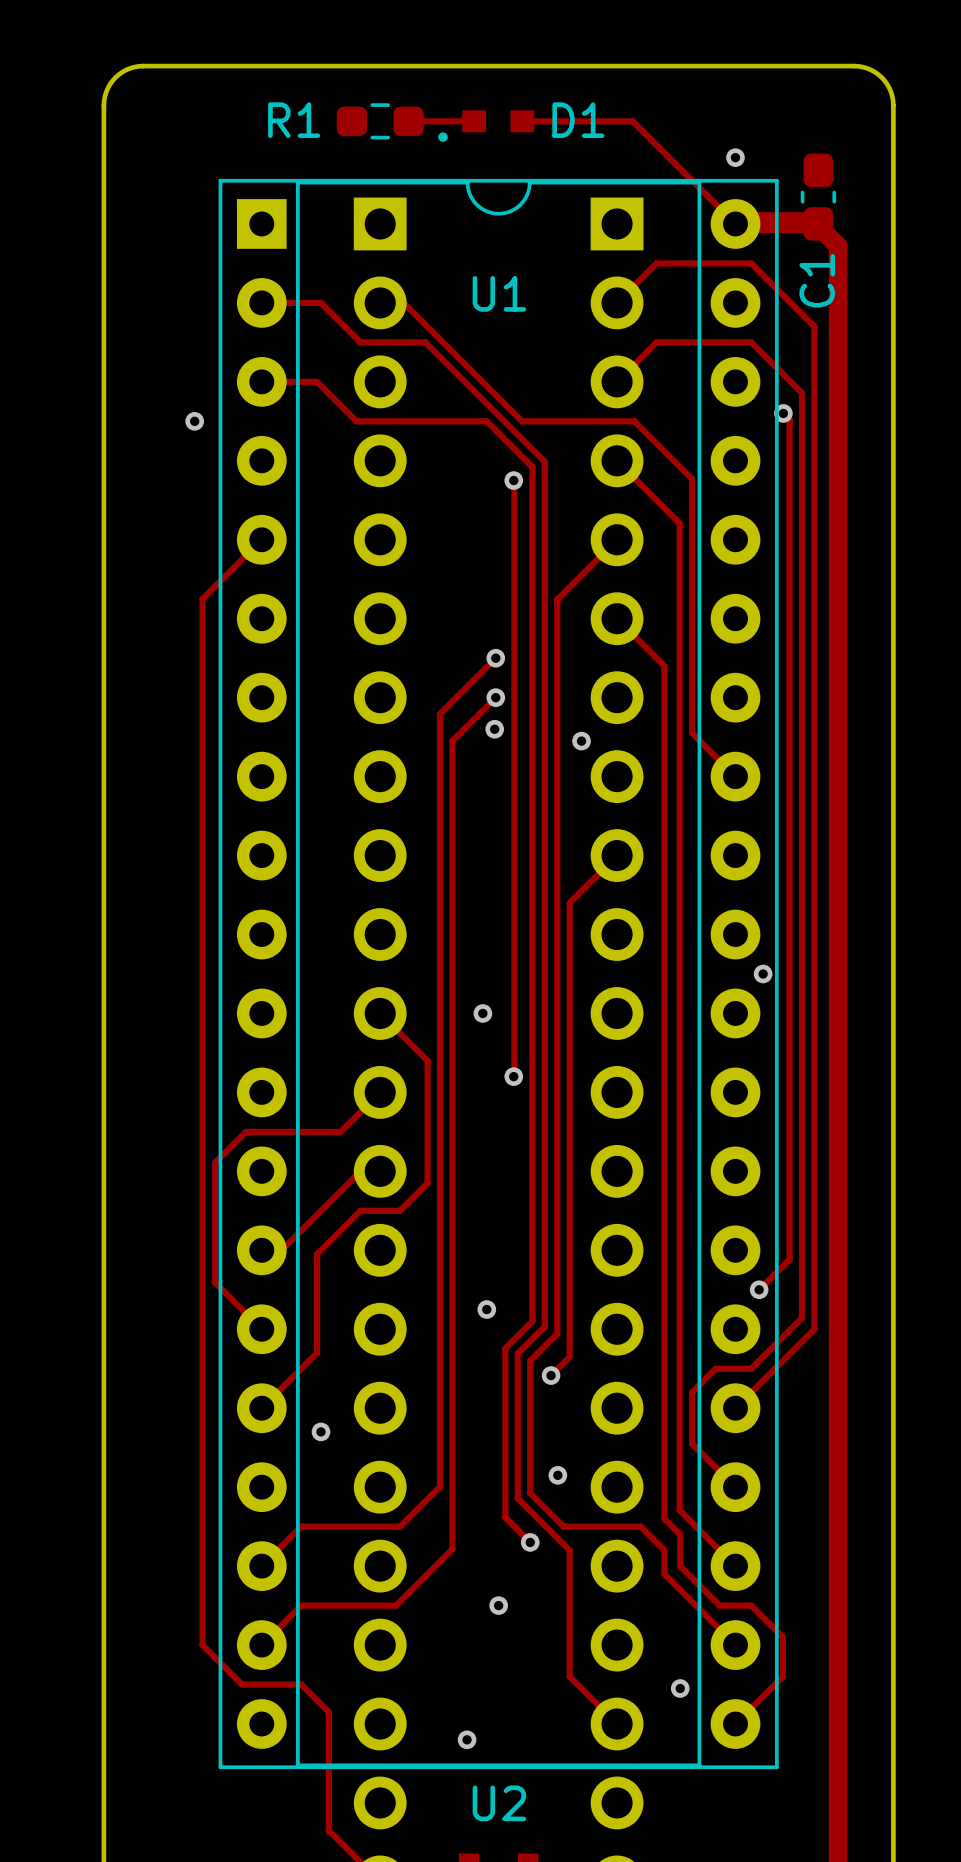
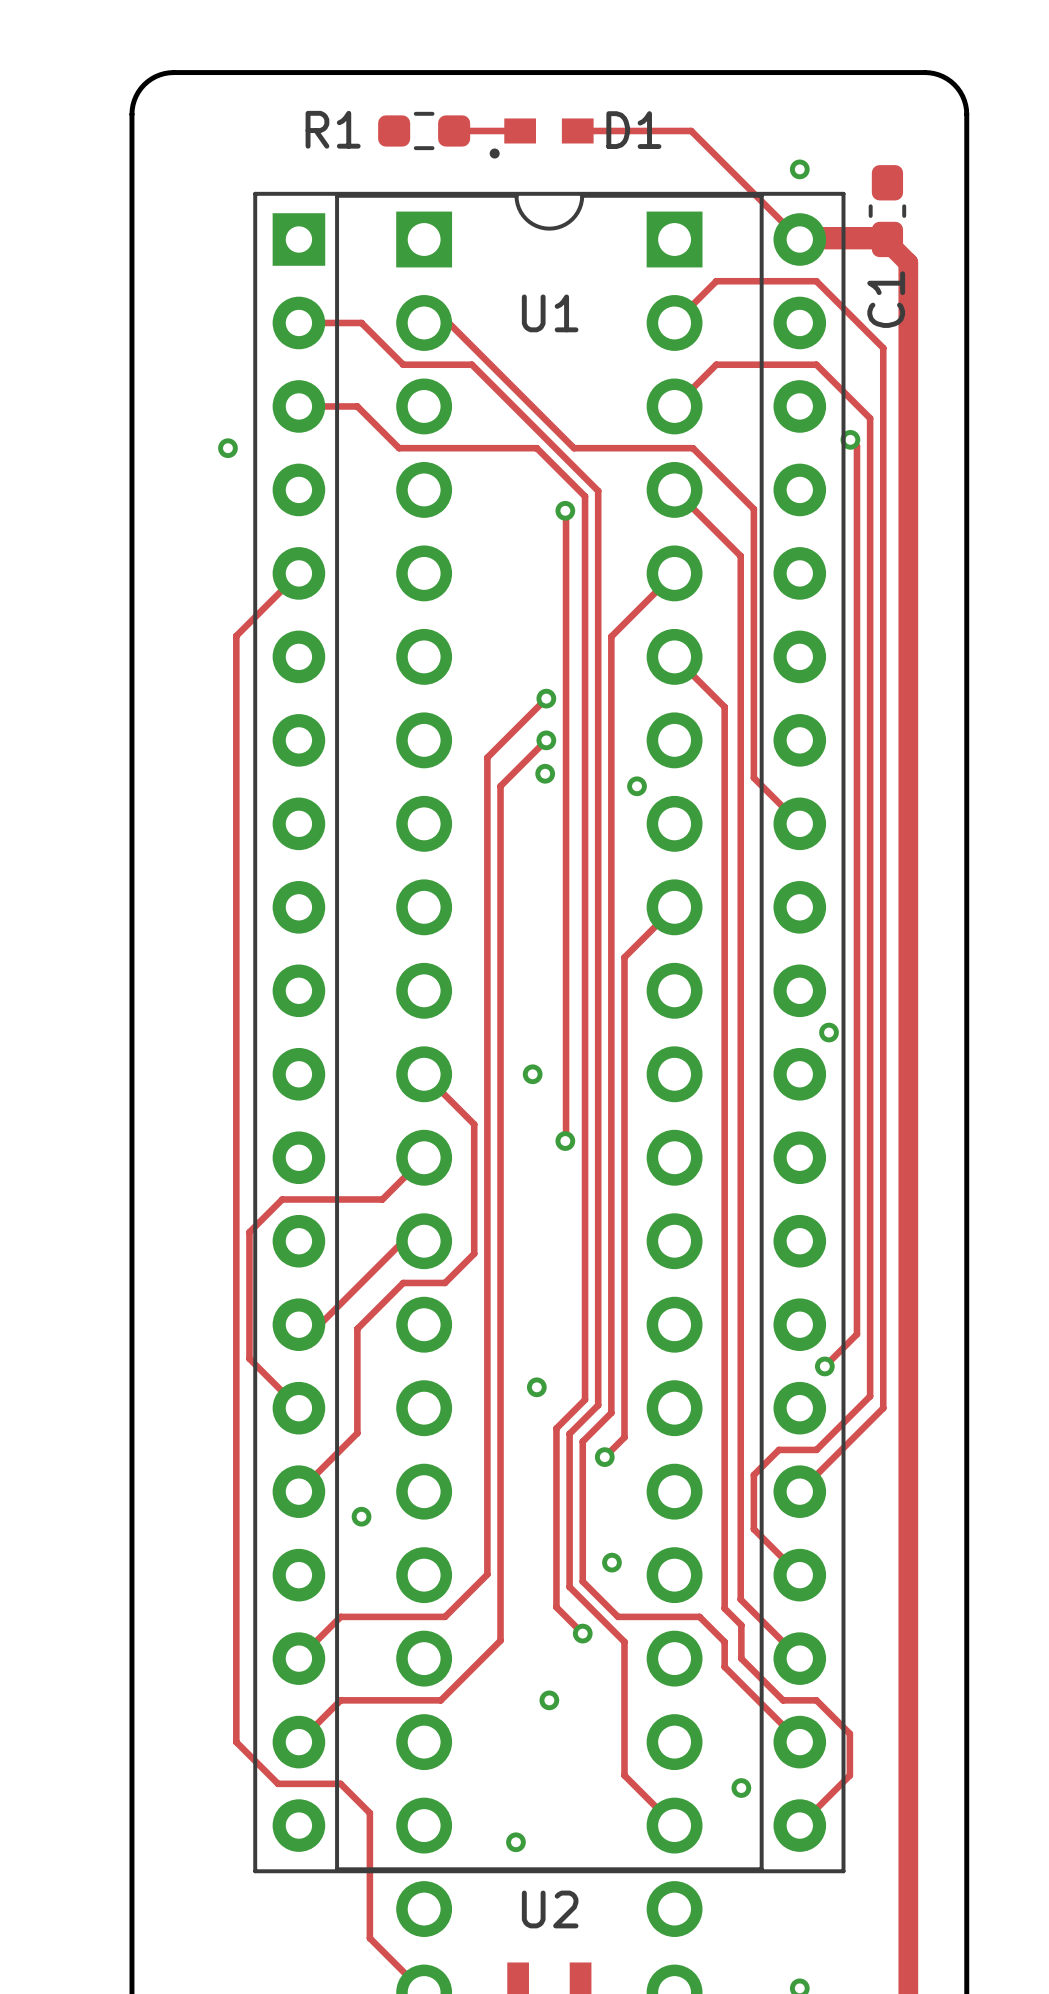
D1 footprint: [438, 110, 535, 142] -> [489, 118, 594, 159]

